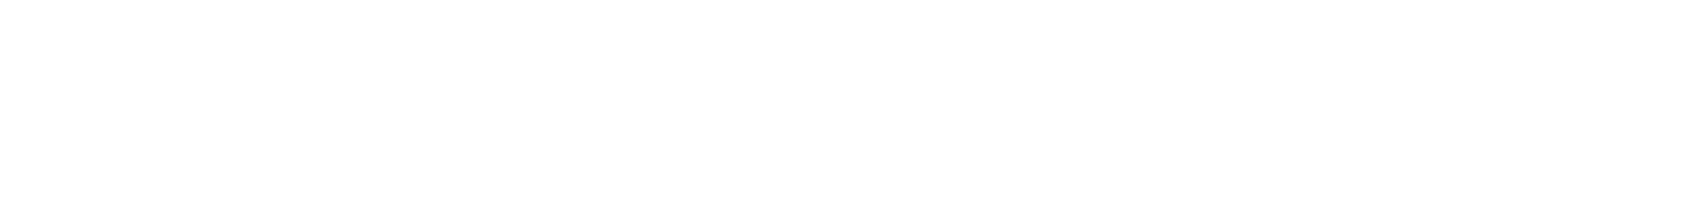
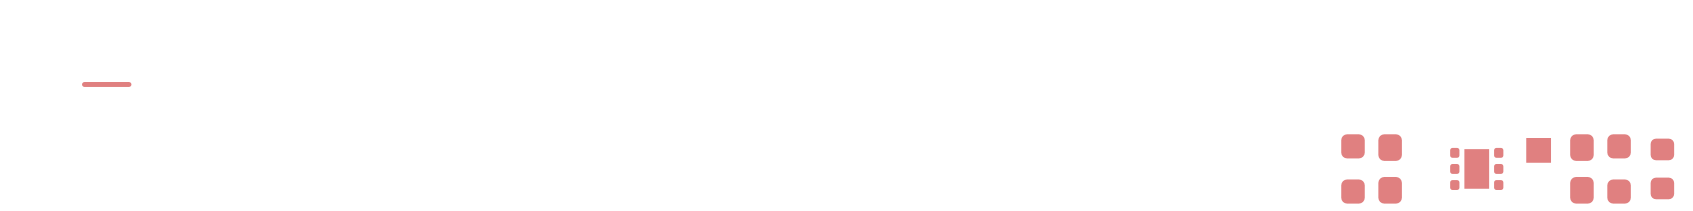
top track: none -> (128, 84) (84, 84)
part: none -> (1538, 150)
part: none -> (1352, 168)
part: none -> (1390, 168)
part: none -> (1476, 168)
part: none -> (1581, 168)
part: none -> (1619, 168)
part: none -> (1662, 168)

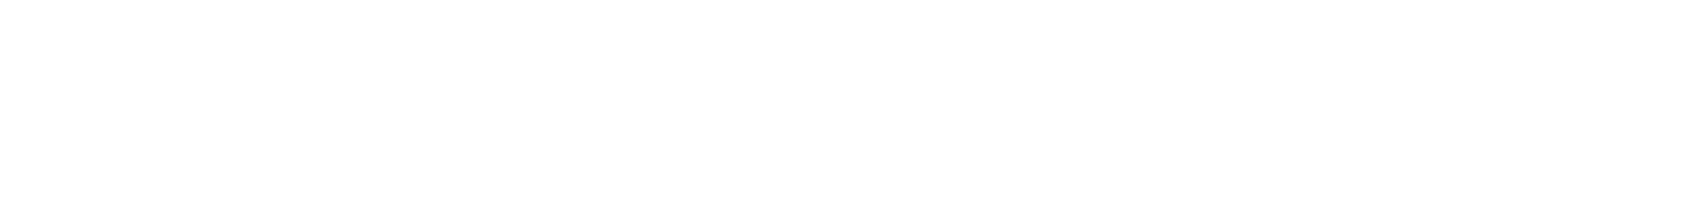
top track: (128, 84) (84, 84) -> none
part: (1538, 150) -> none
part: (1352, 168) -> none
part: (1390, 168) -> none
part: (1476, 168) -> none
part: (1581, 168) -> none
part: (1619, 168) -> none
part: (1662, 168) -> none

